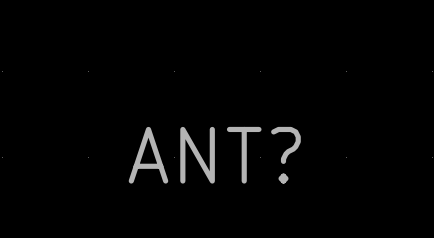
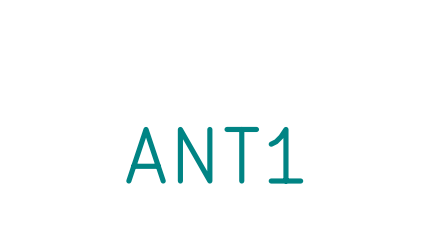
ANT? name: ANT? (214, 155) -> ANT1 (214, 155)

